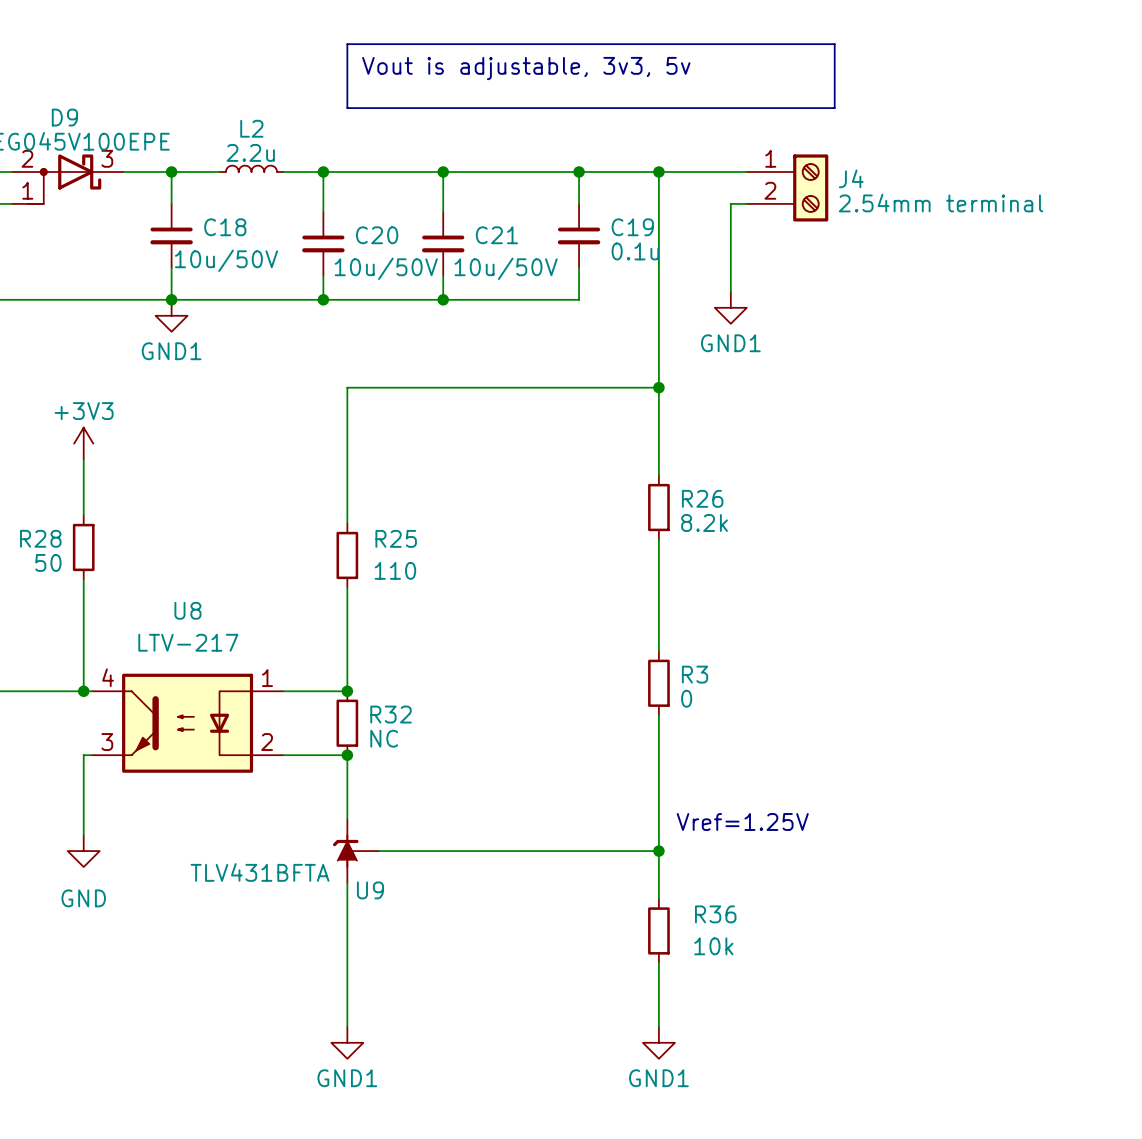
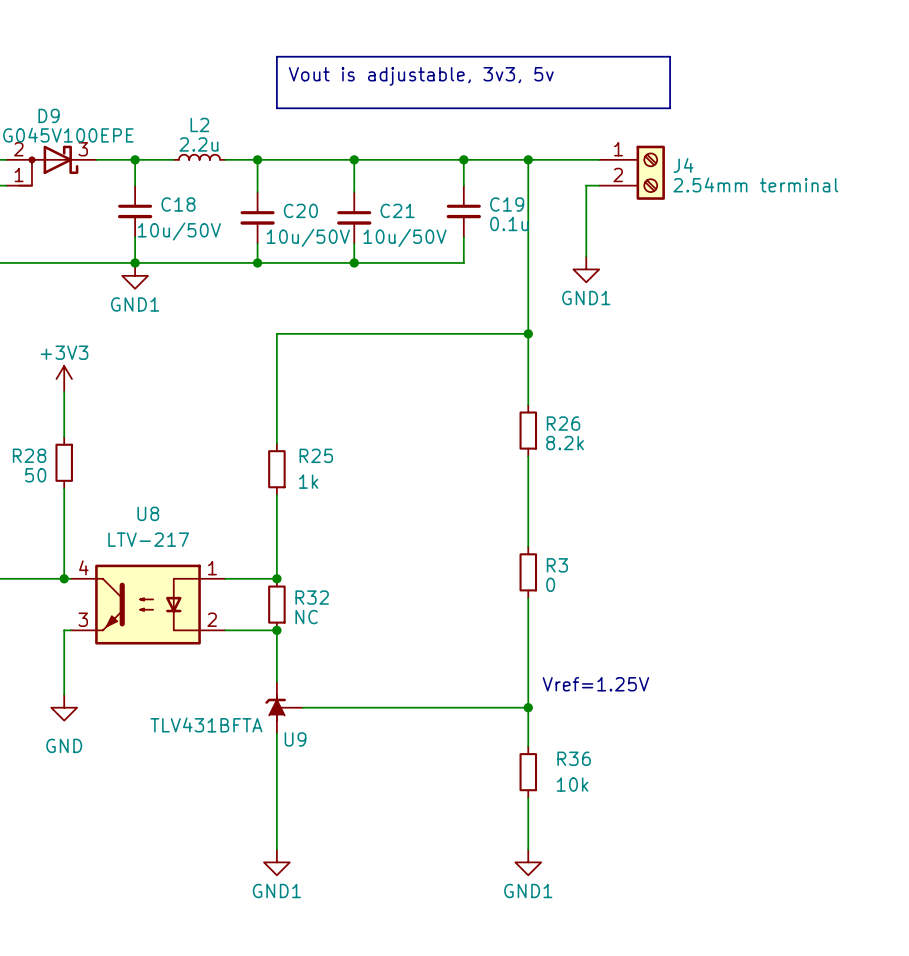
R25 value: 110 (395, 570) -> 1k (308, 481)

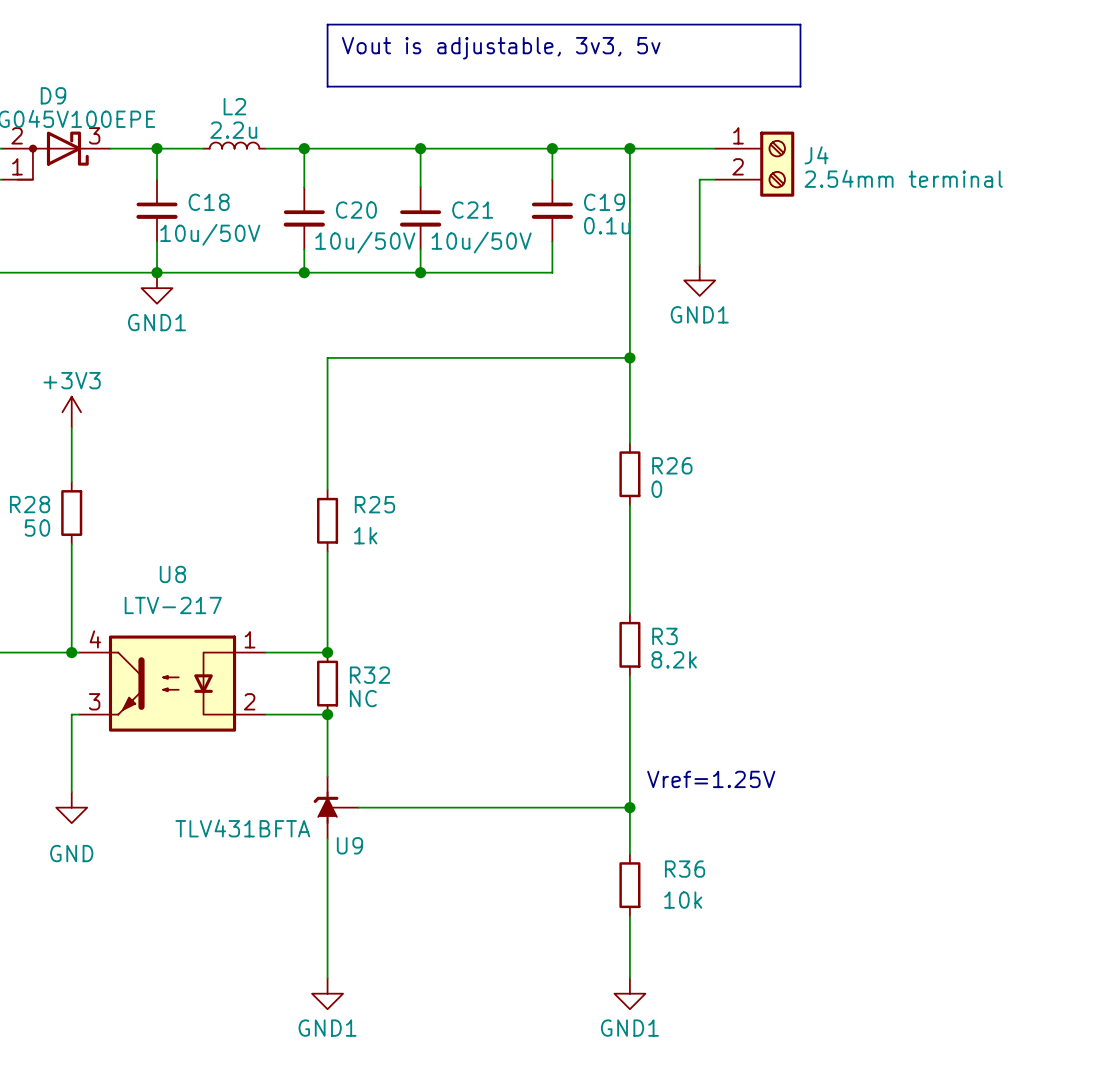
R26 value: 8.2k (565, 443) -> 0 (656, 489)
R3 value: 0 (550, 584) -> 8.2k (674, 659)

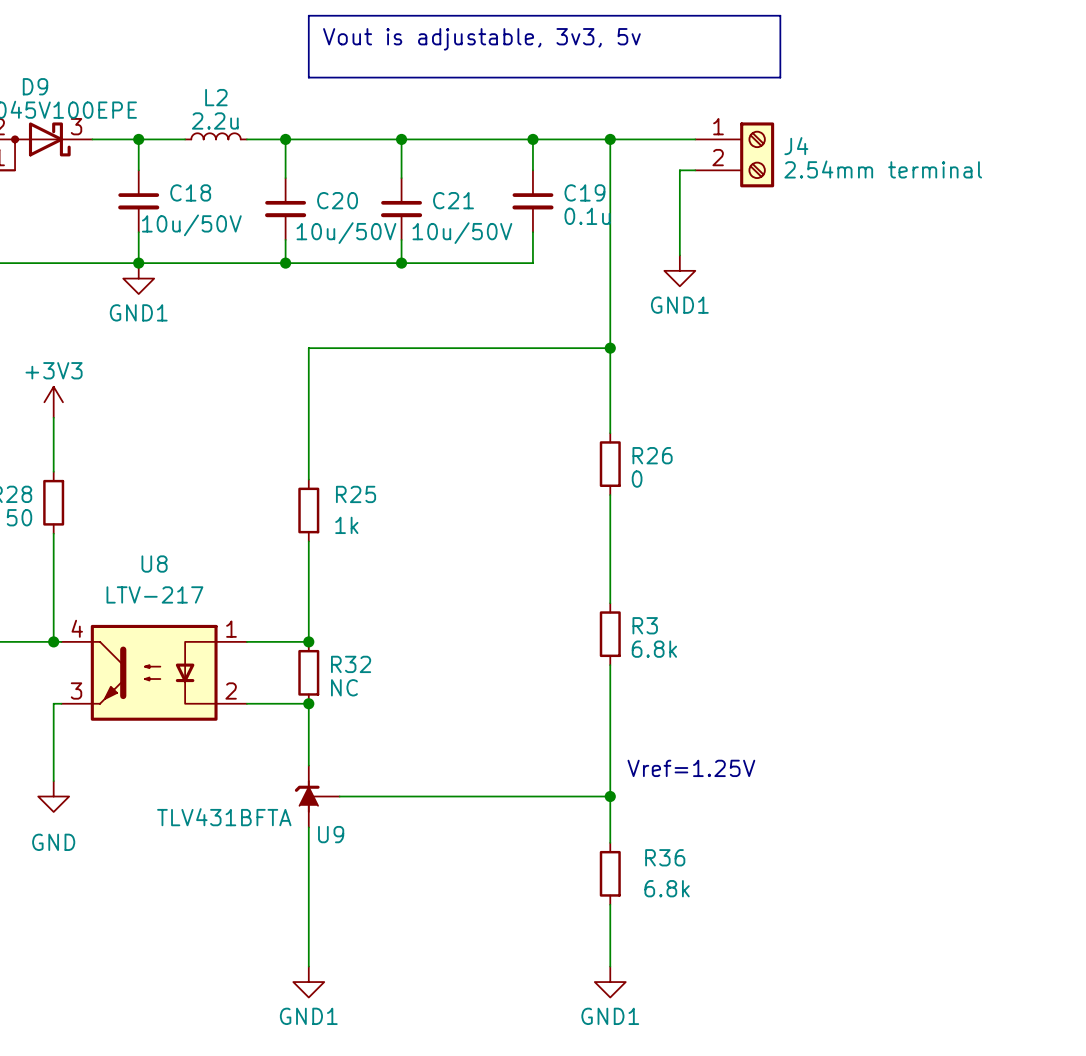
R3 value: 8.2k (674, 659) -> 6.8k (654, 649)
R36 value: 10k (683, 900) -> 6.8k (667, 888)

